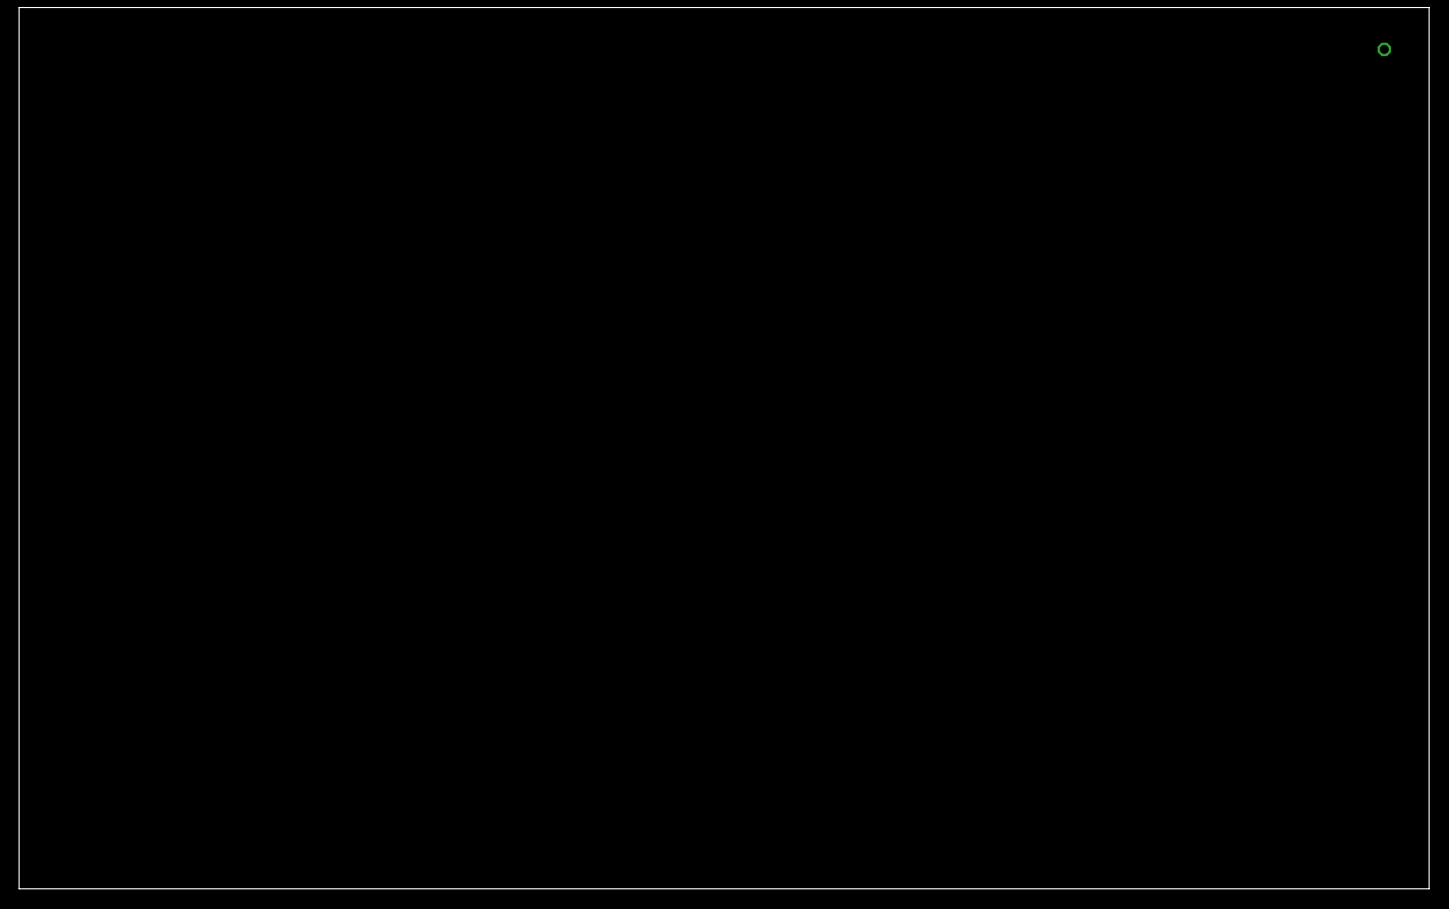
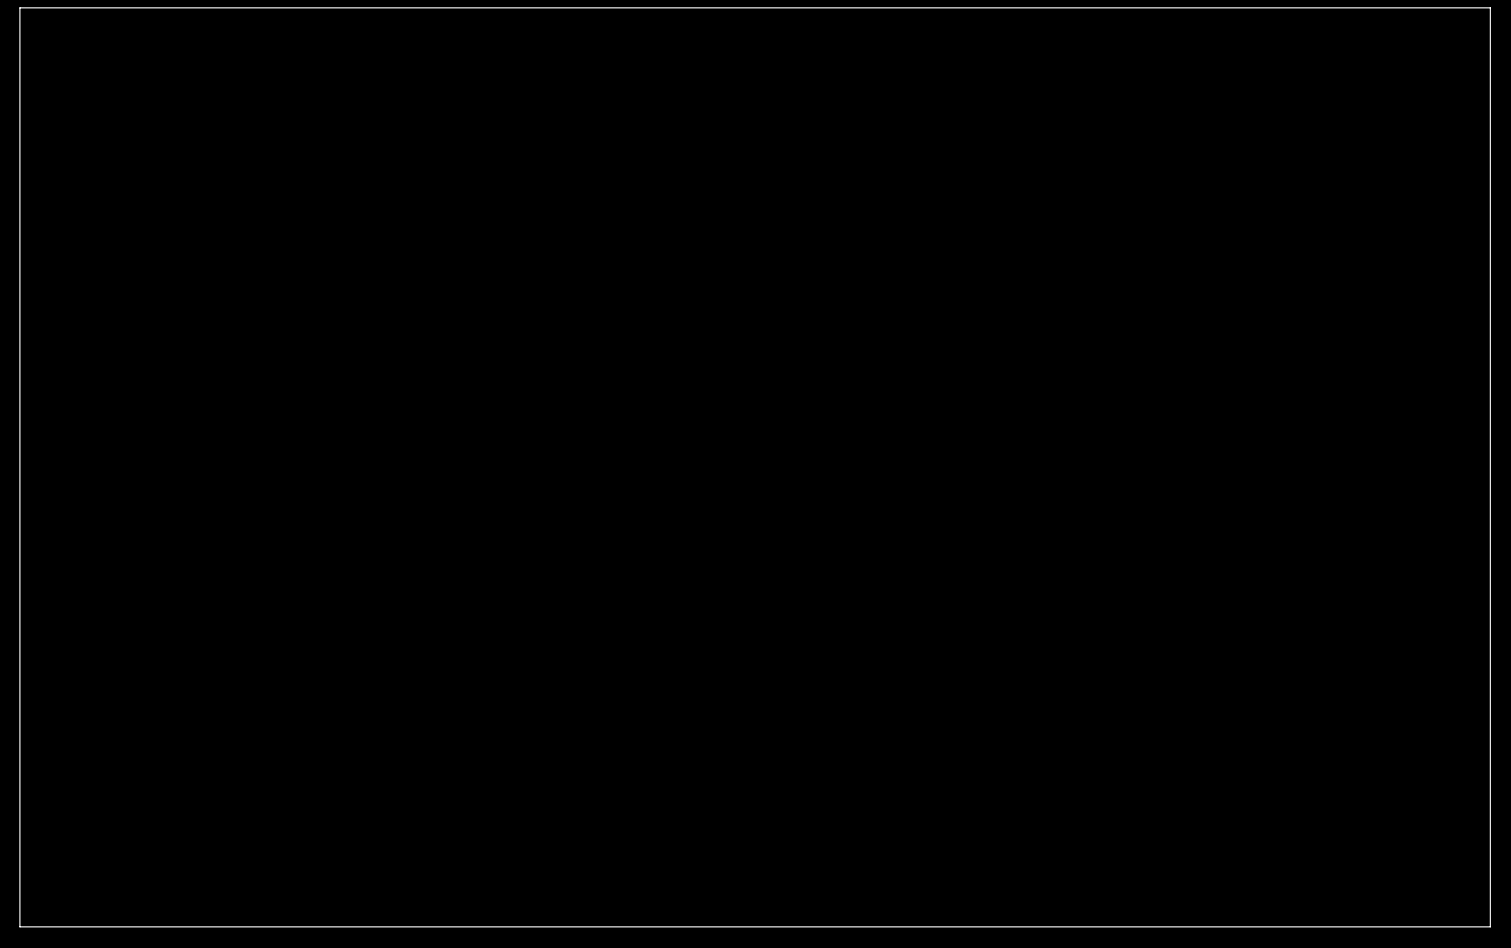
part: (1384, 49) -> none

